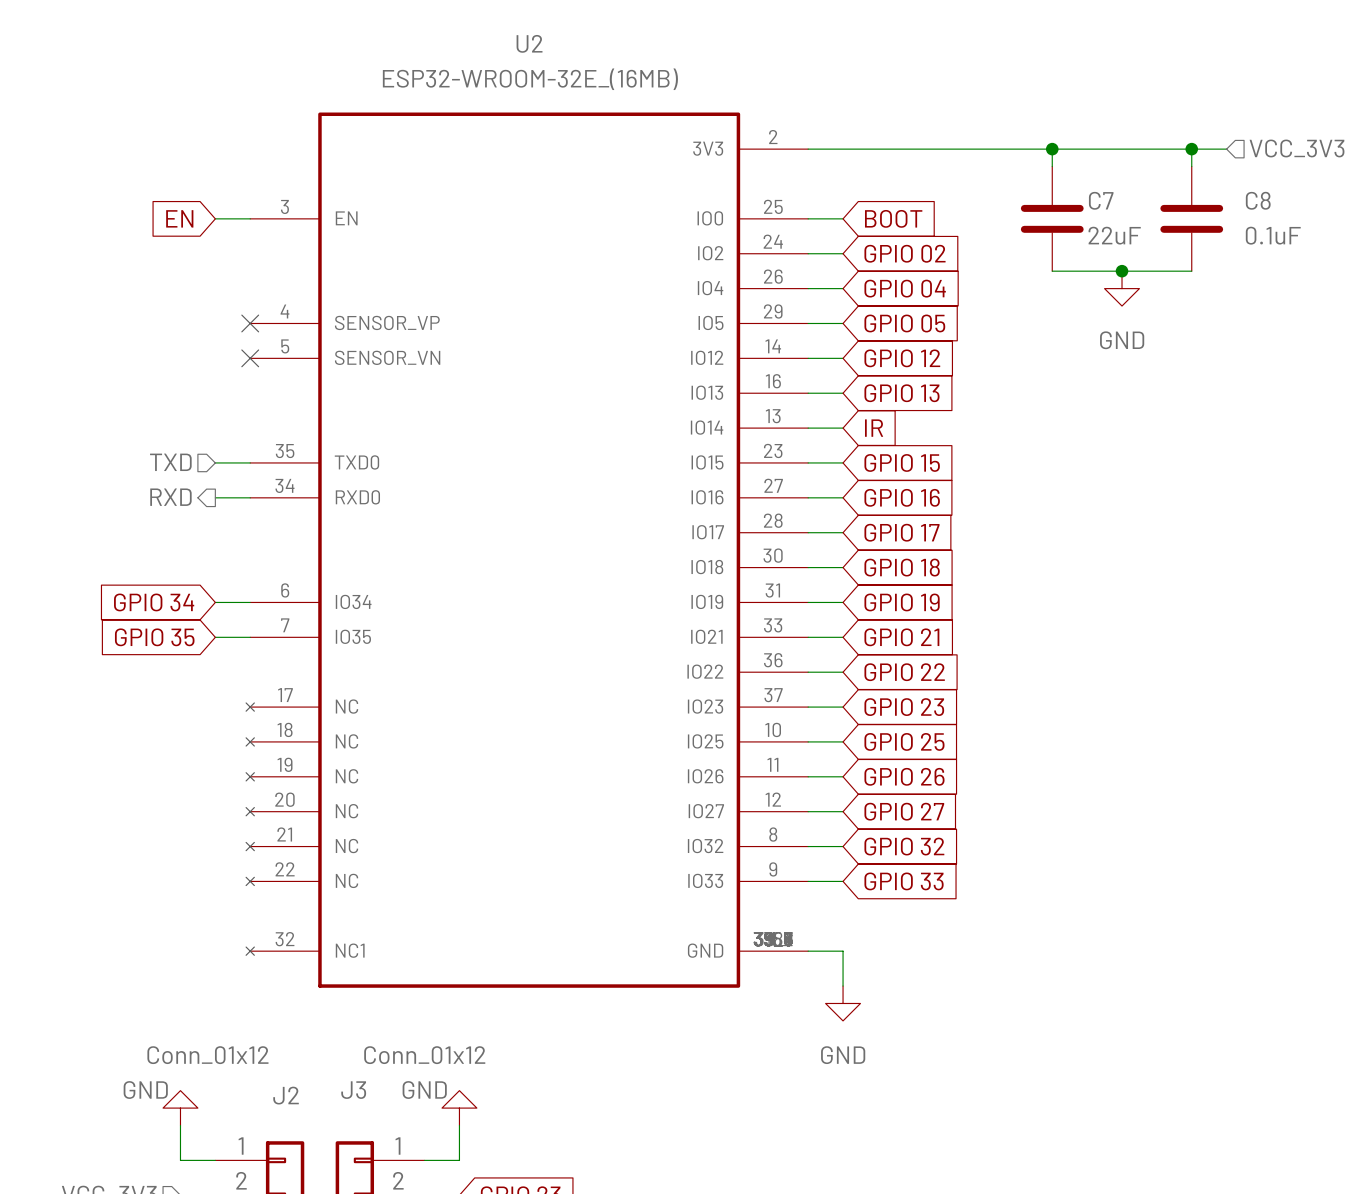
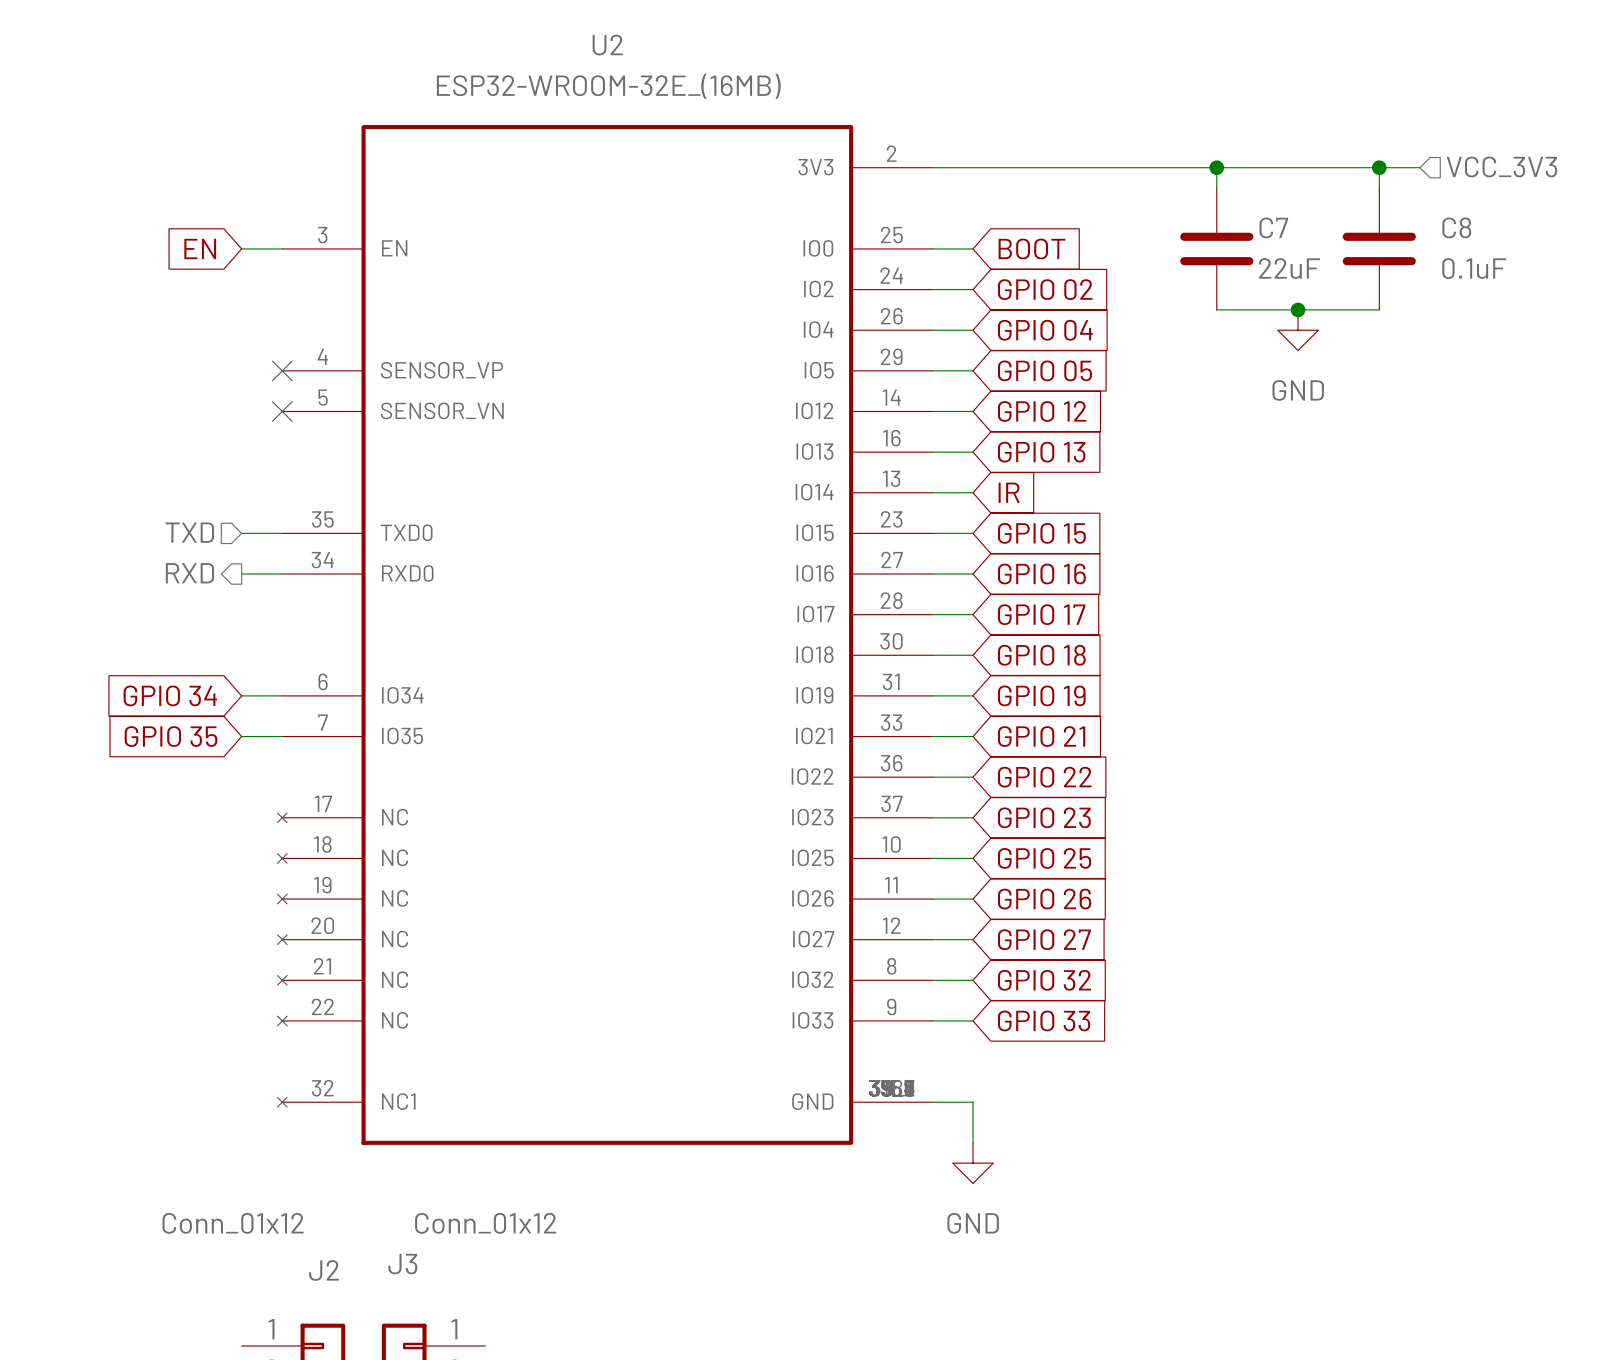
power symbol: GND (180, 1108) -> none
power symbol: GND (459, 1108) -> none
wire: (180, 1125) (180, 1160) (215, 1160) -> none
wire: (459, 1125) (459, 1160) (424, 1160) -> none

